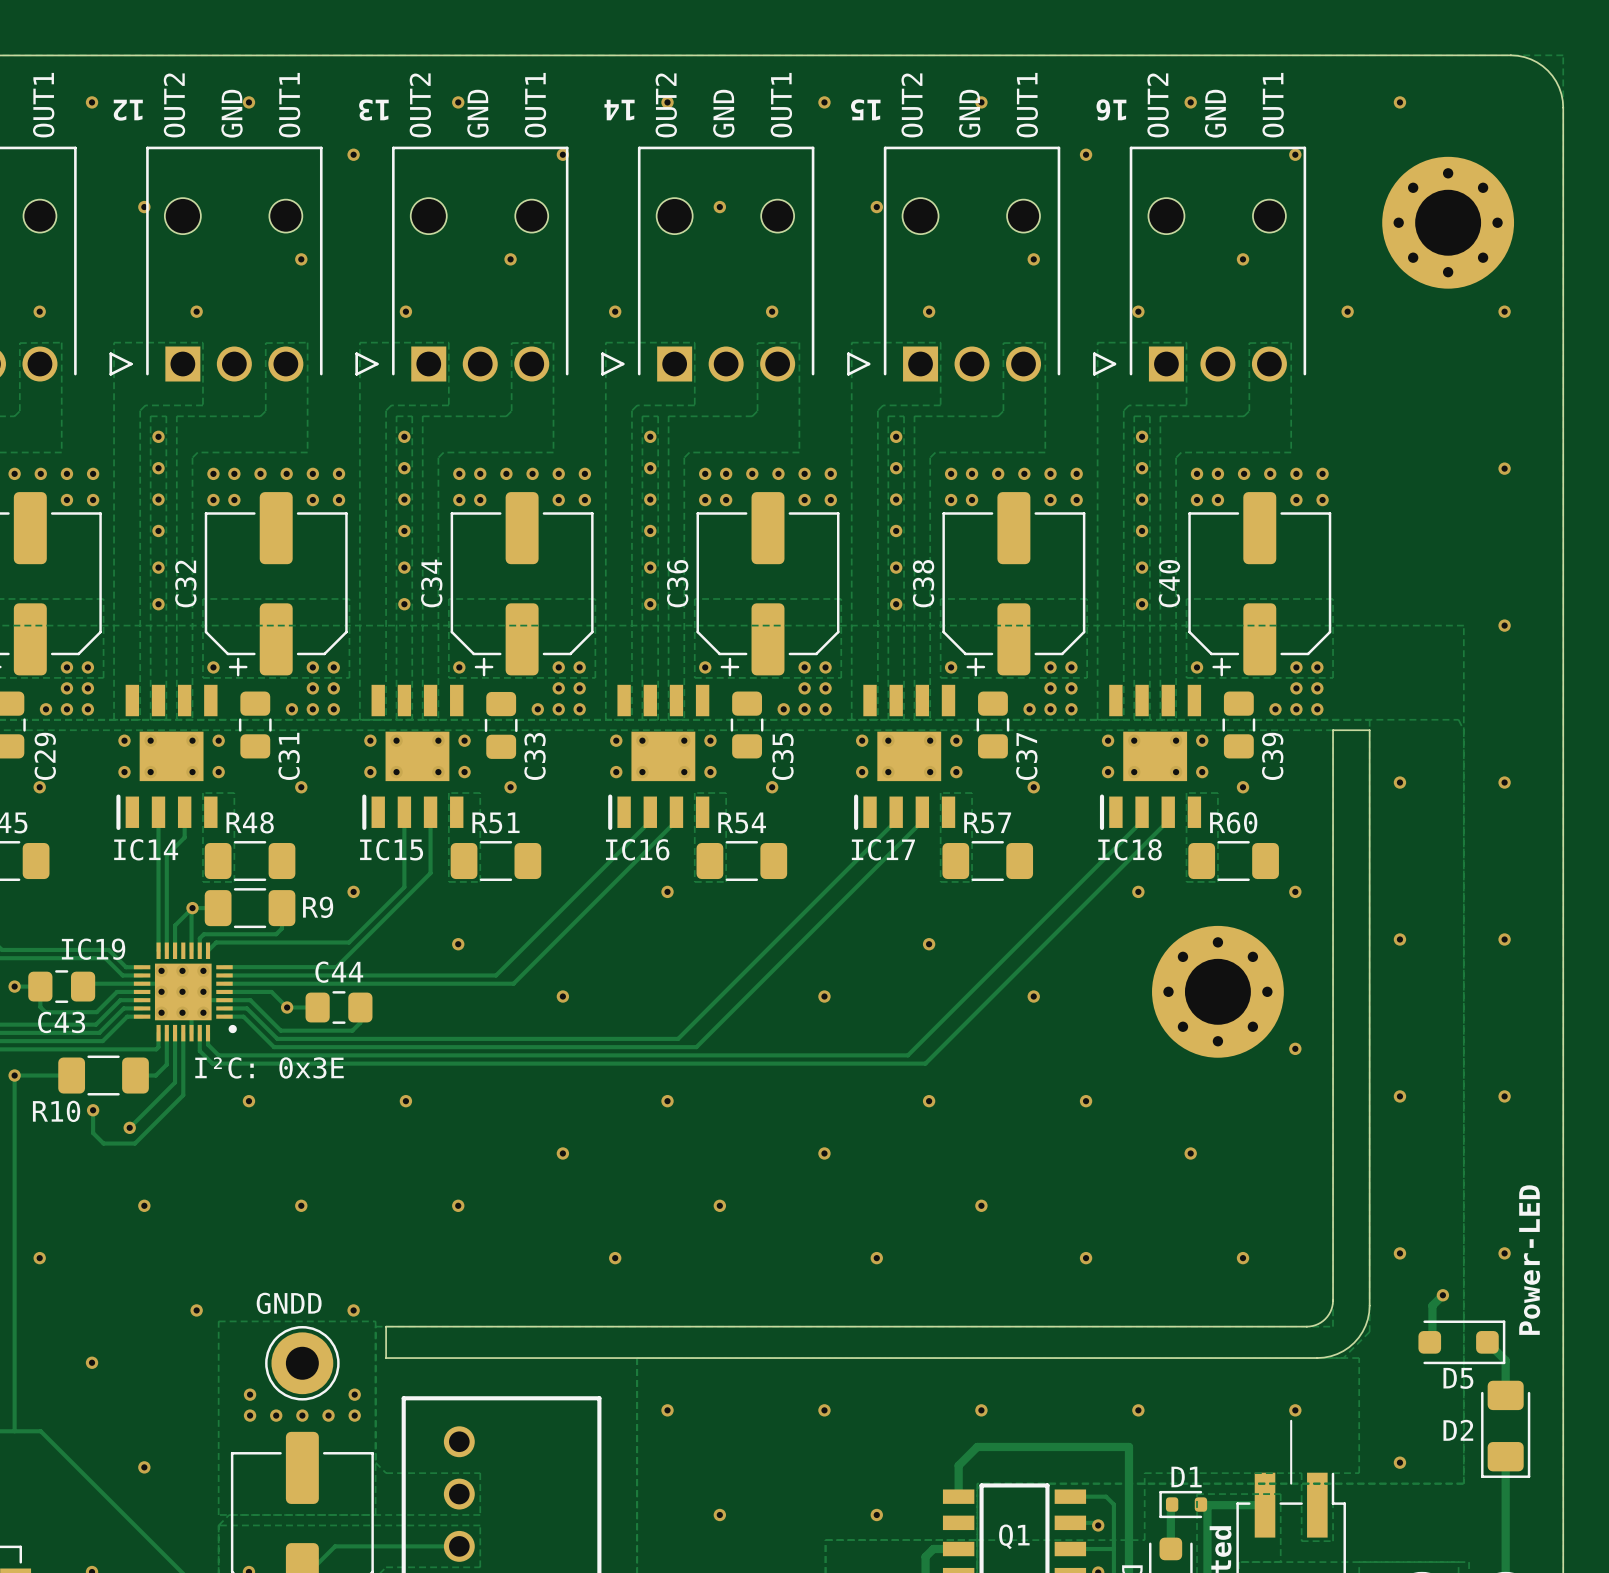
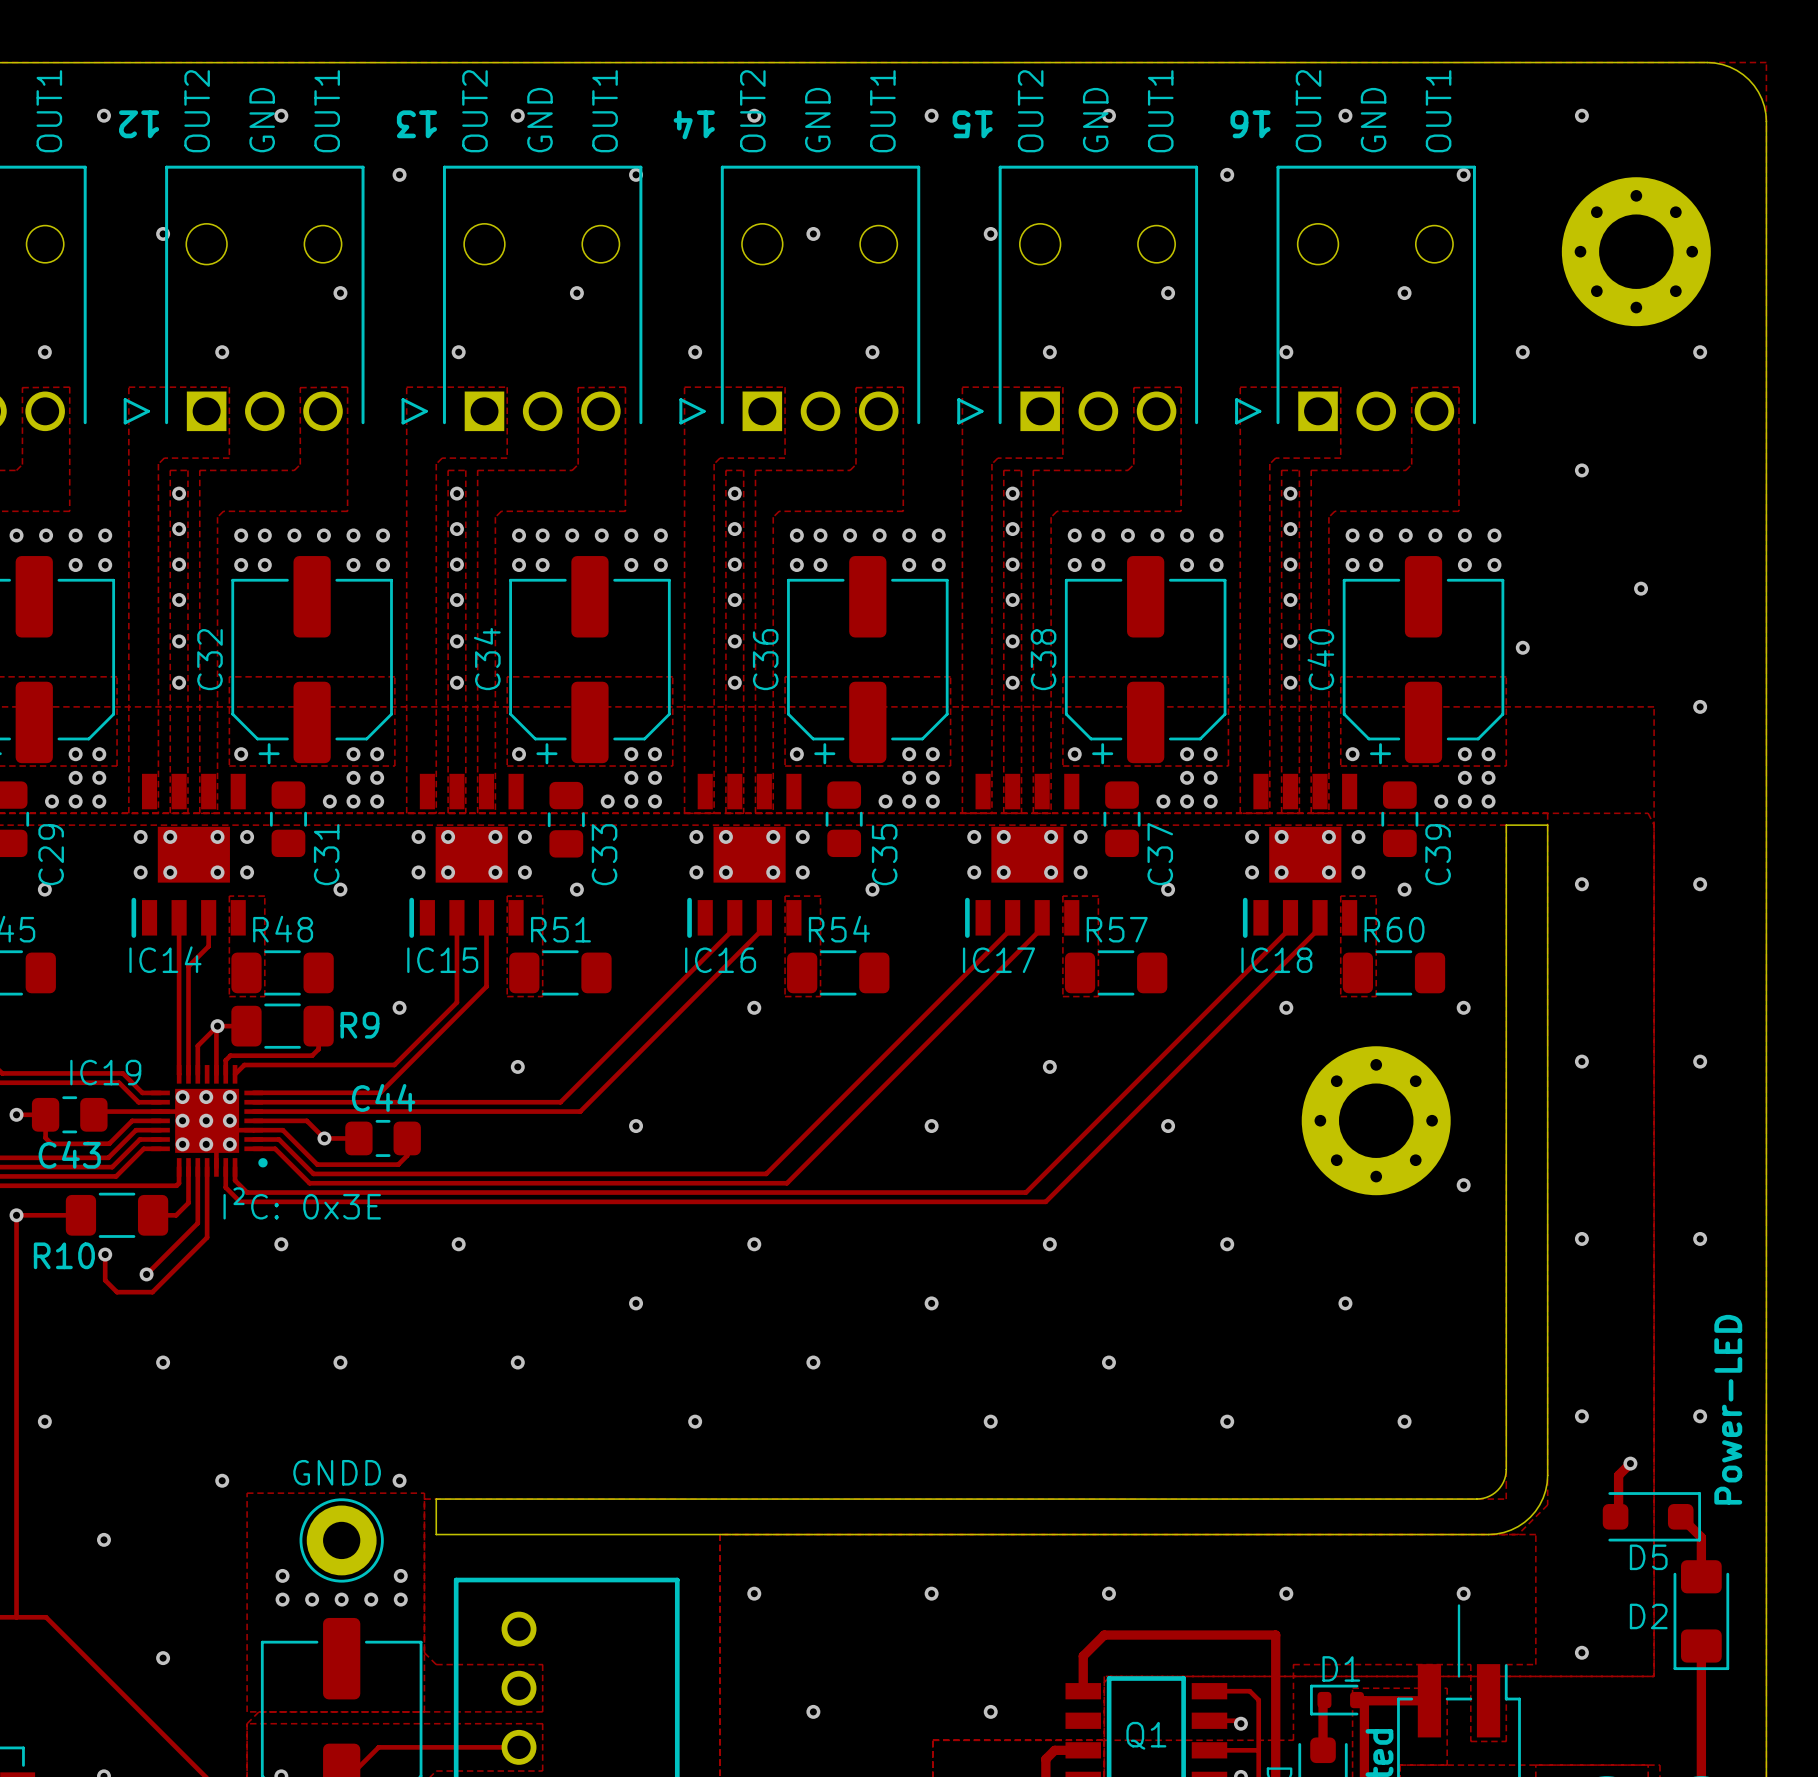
via: none -> (1581, 470)
via: (1504, 468) -> none
via: none -> (1641, 588)
via: none -> (1522, 647)

